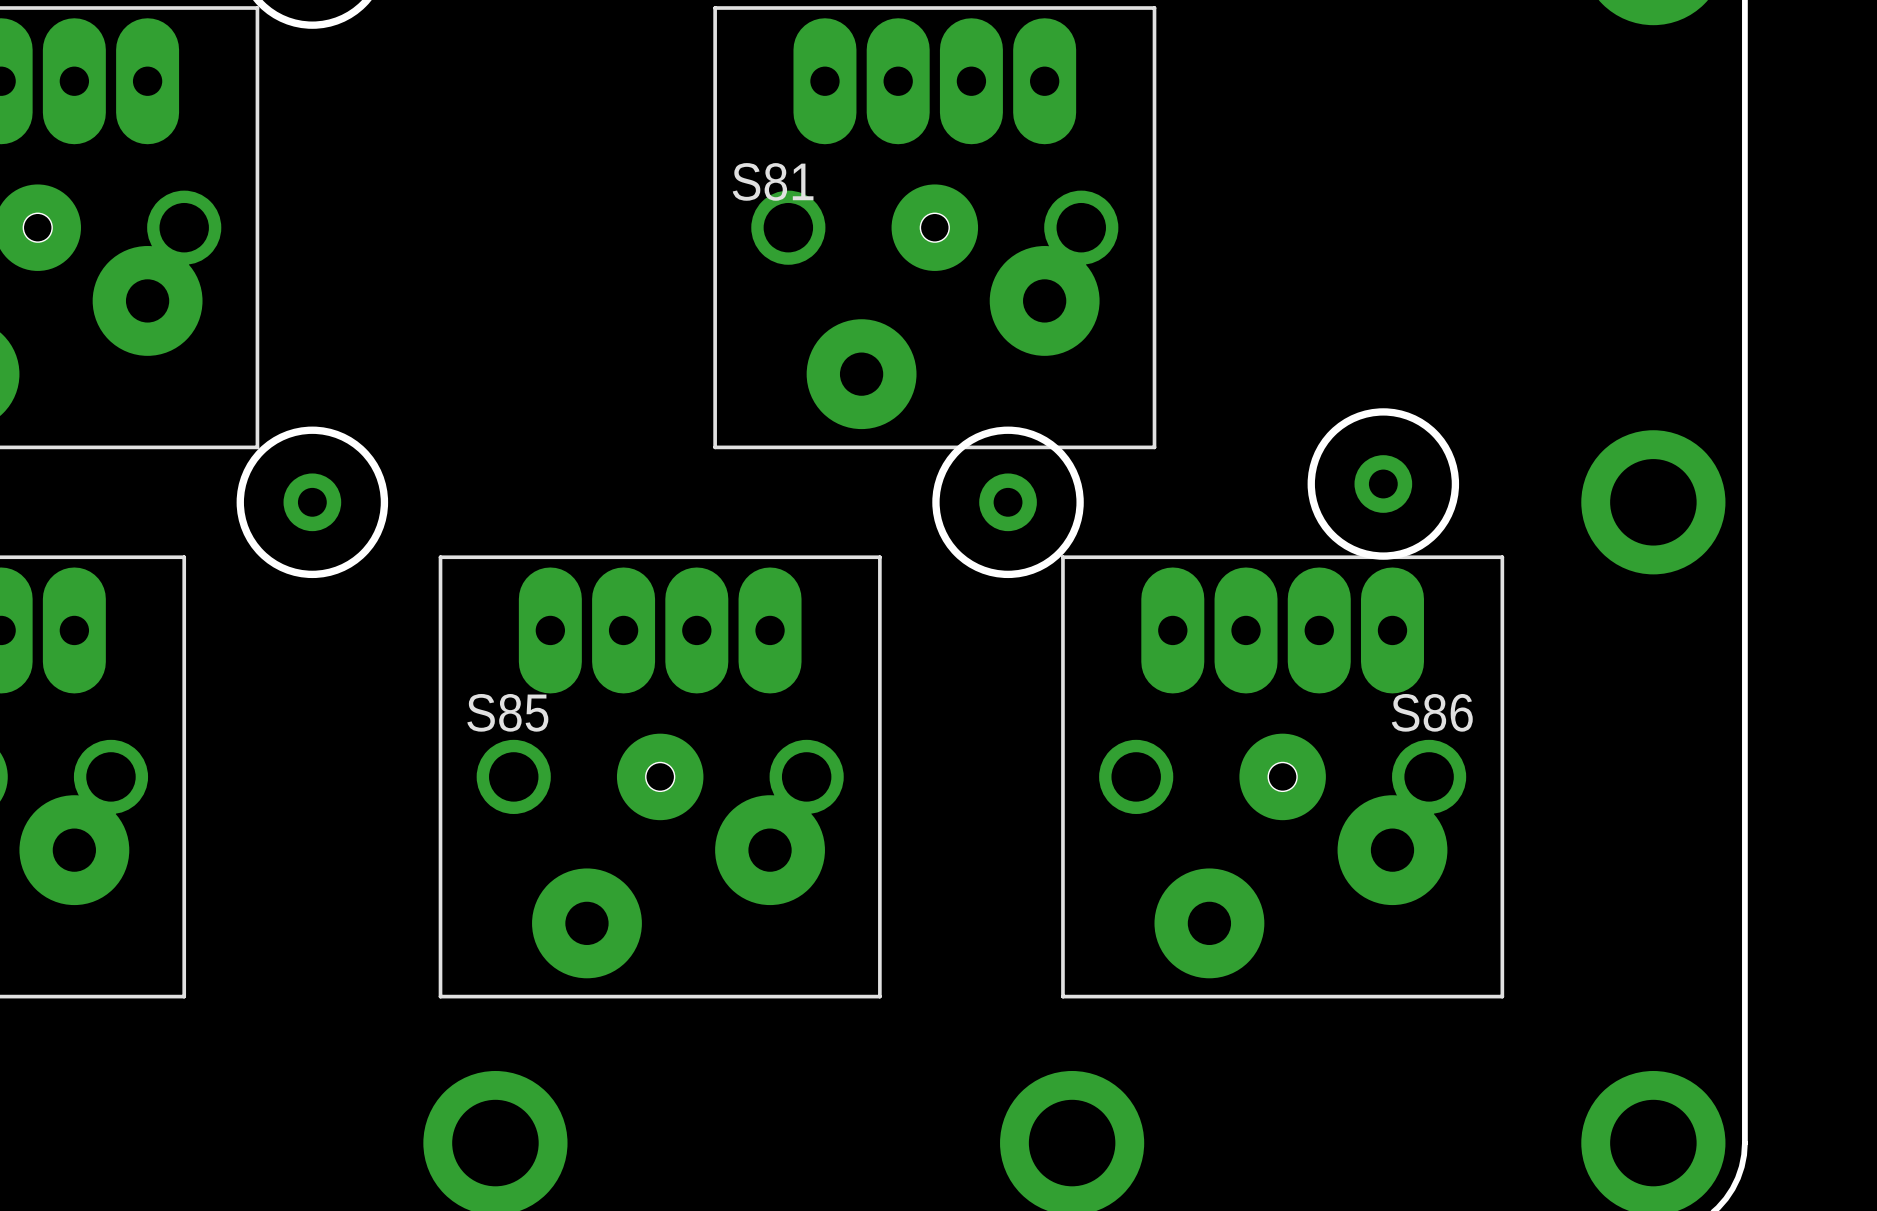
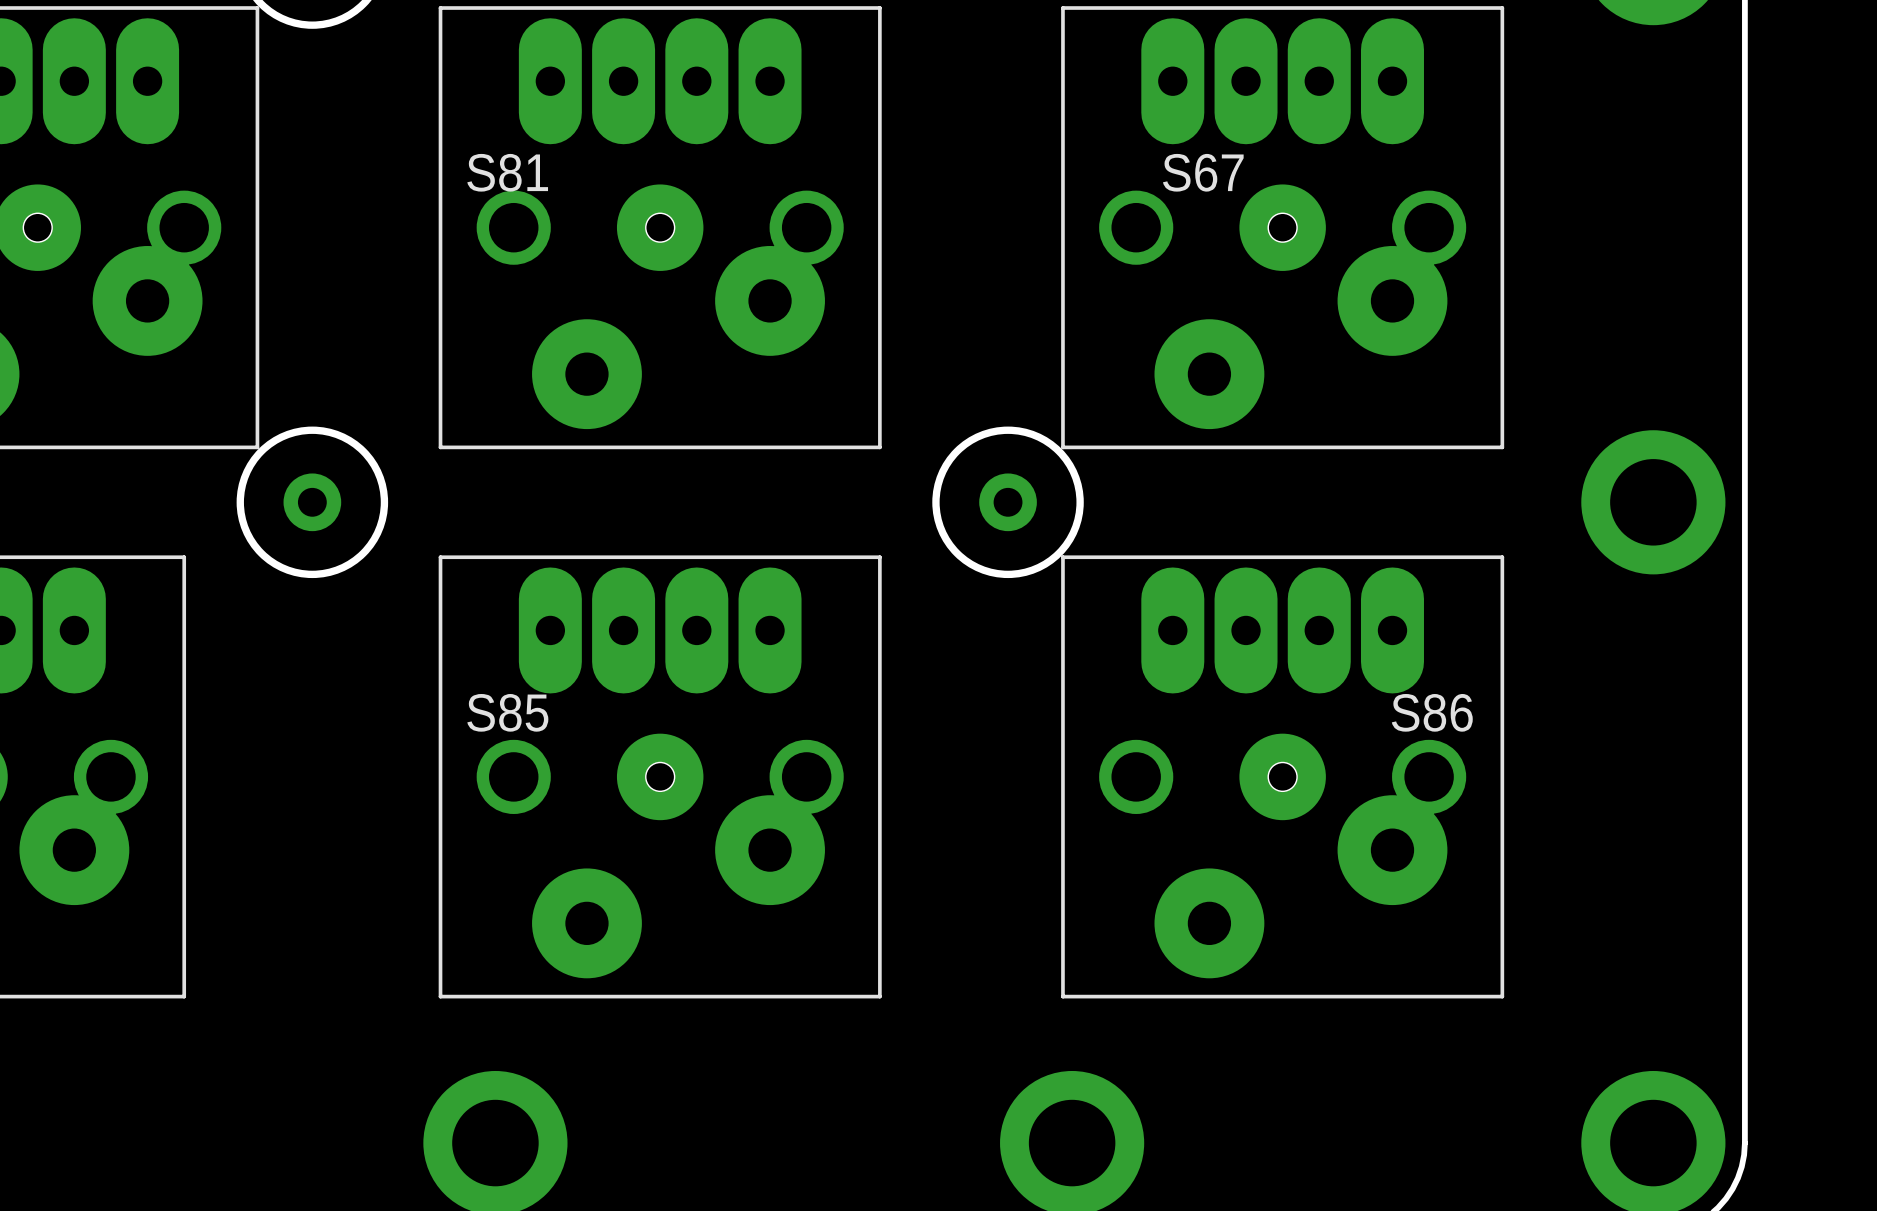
S81 name position: S81 (773, 181) -> S81 (507, 172)
S81 position: (934, 227) -> (660, 227)
S67: none -> (1282, 227)
round board edge: [1307, 408, 1460, 560] -> none
via: (1383, 484) -> none

